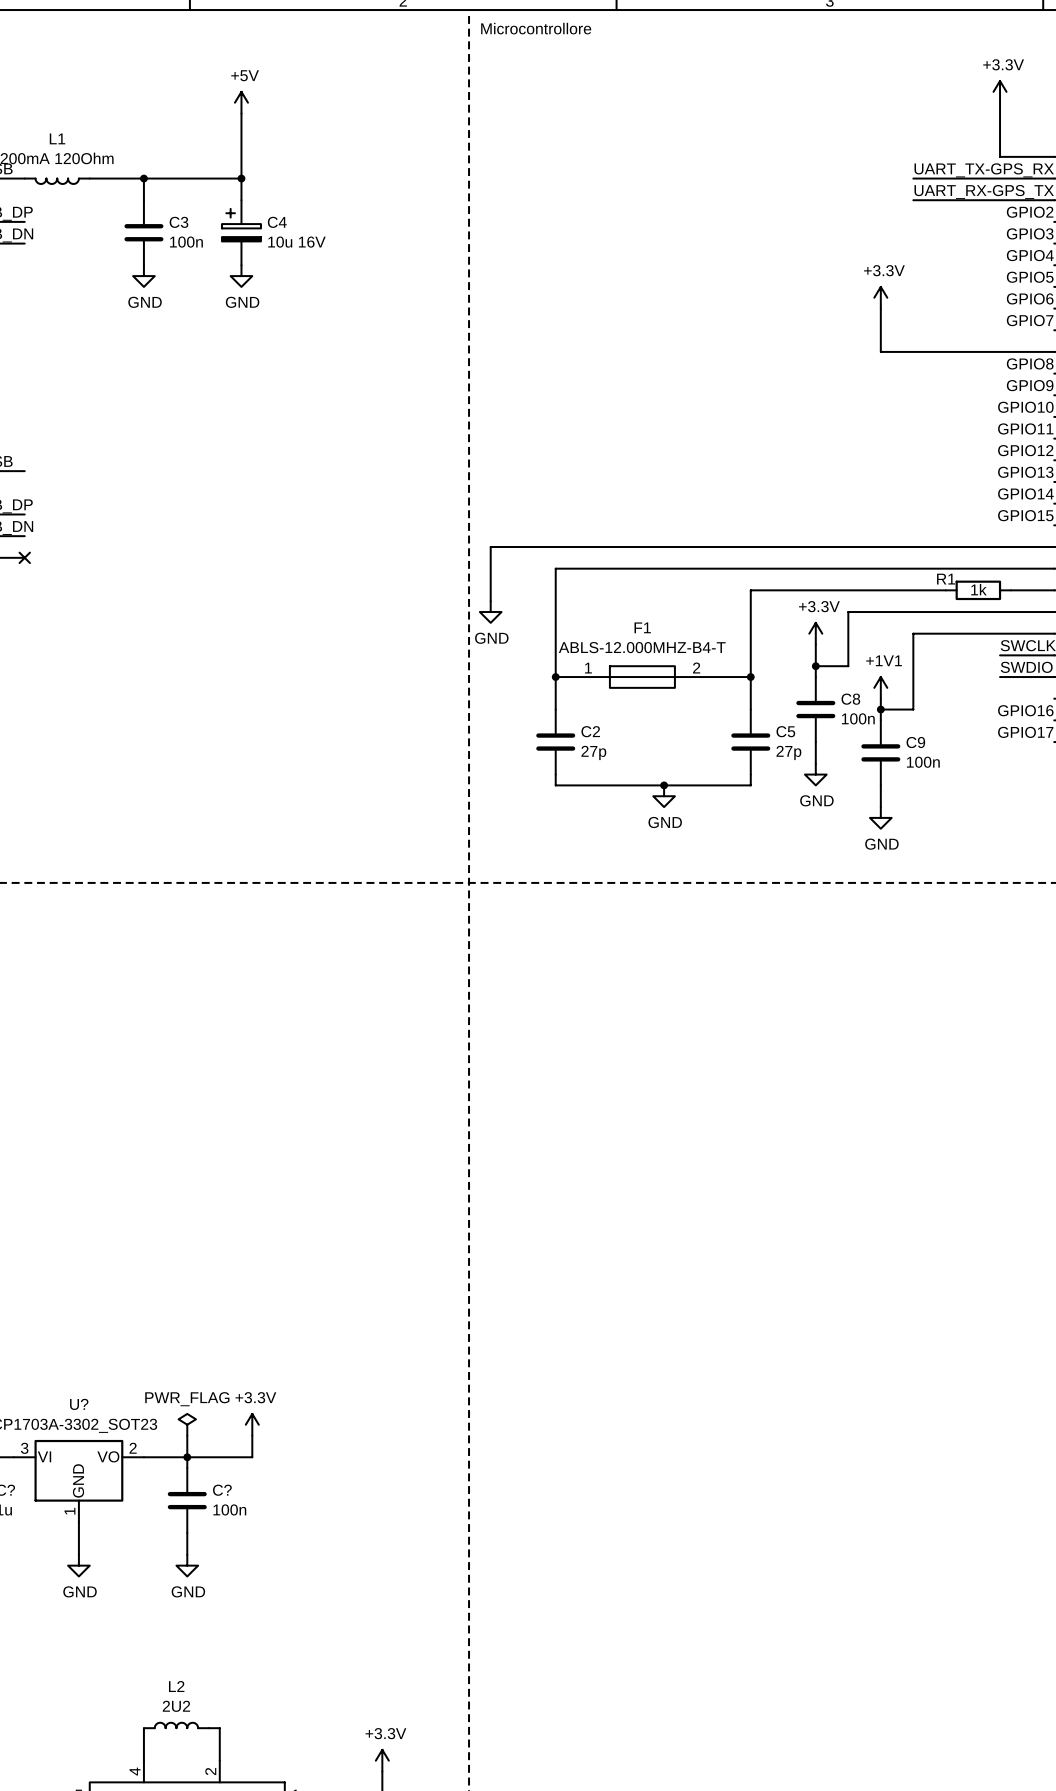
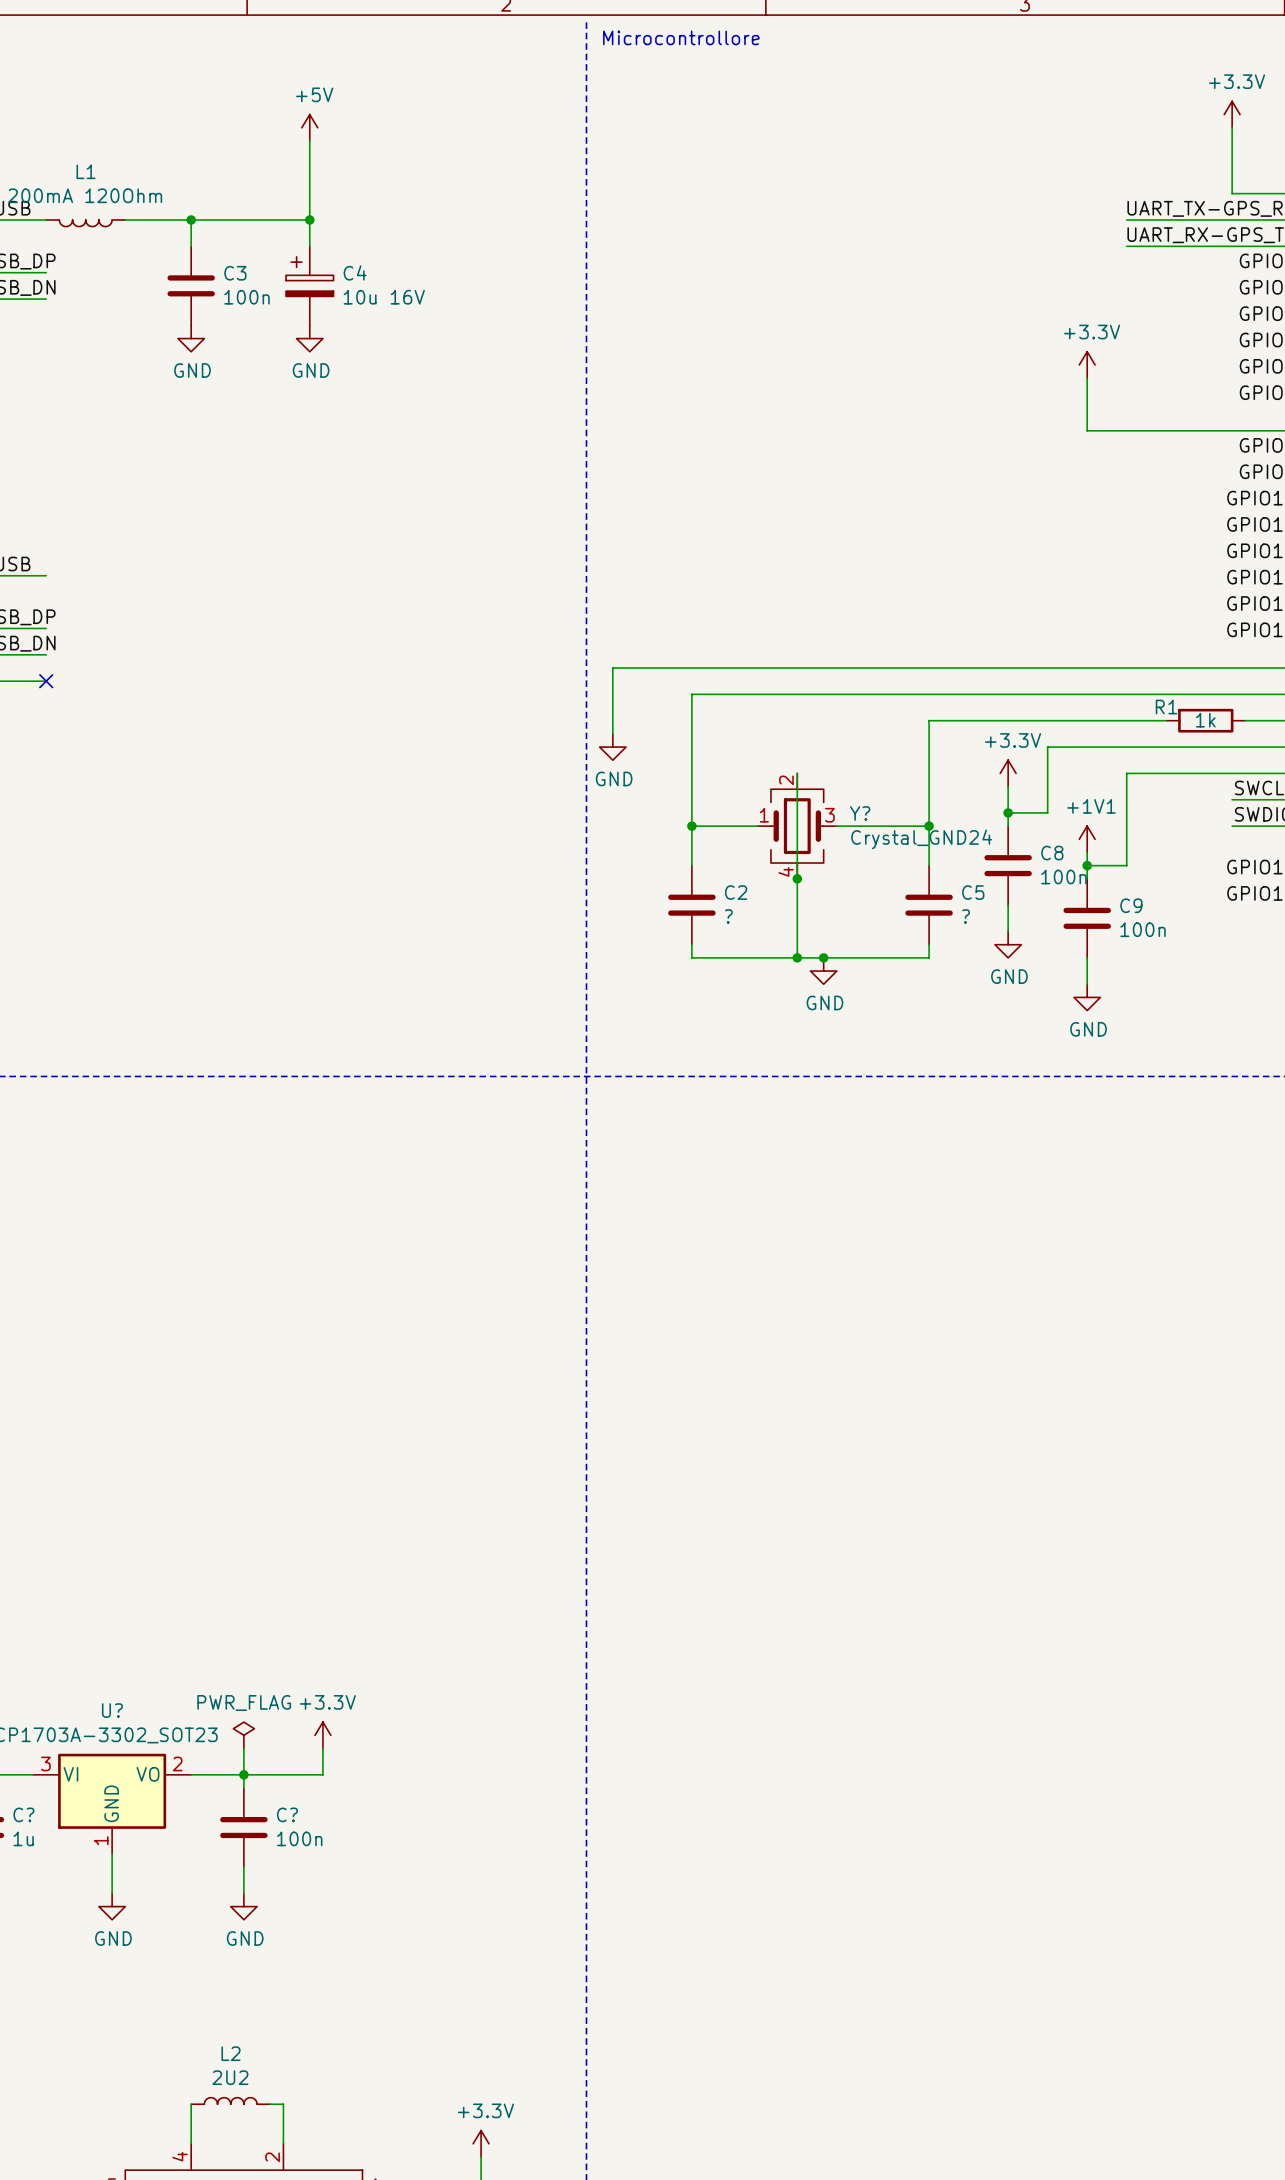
wire: none -> (797, 773) (797, 957)
F1: ABLS-12.000MHZ-B4-T (642, 677) -> none
Y?: none -> Crystal_GND24 (797, 826)
junction: none -> (797, 878)
C2 value: 27p (593, 752) -> ? (728, 916)
C5 value: 27p (788, 752) -> ? (966, 916)
junction: none -> (797, 957)

